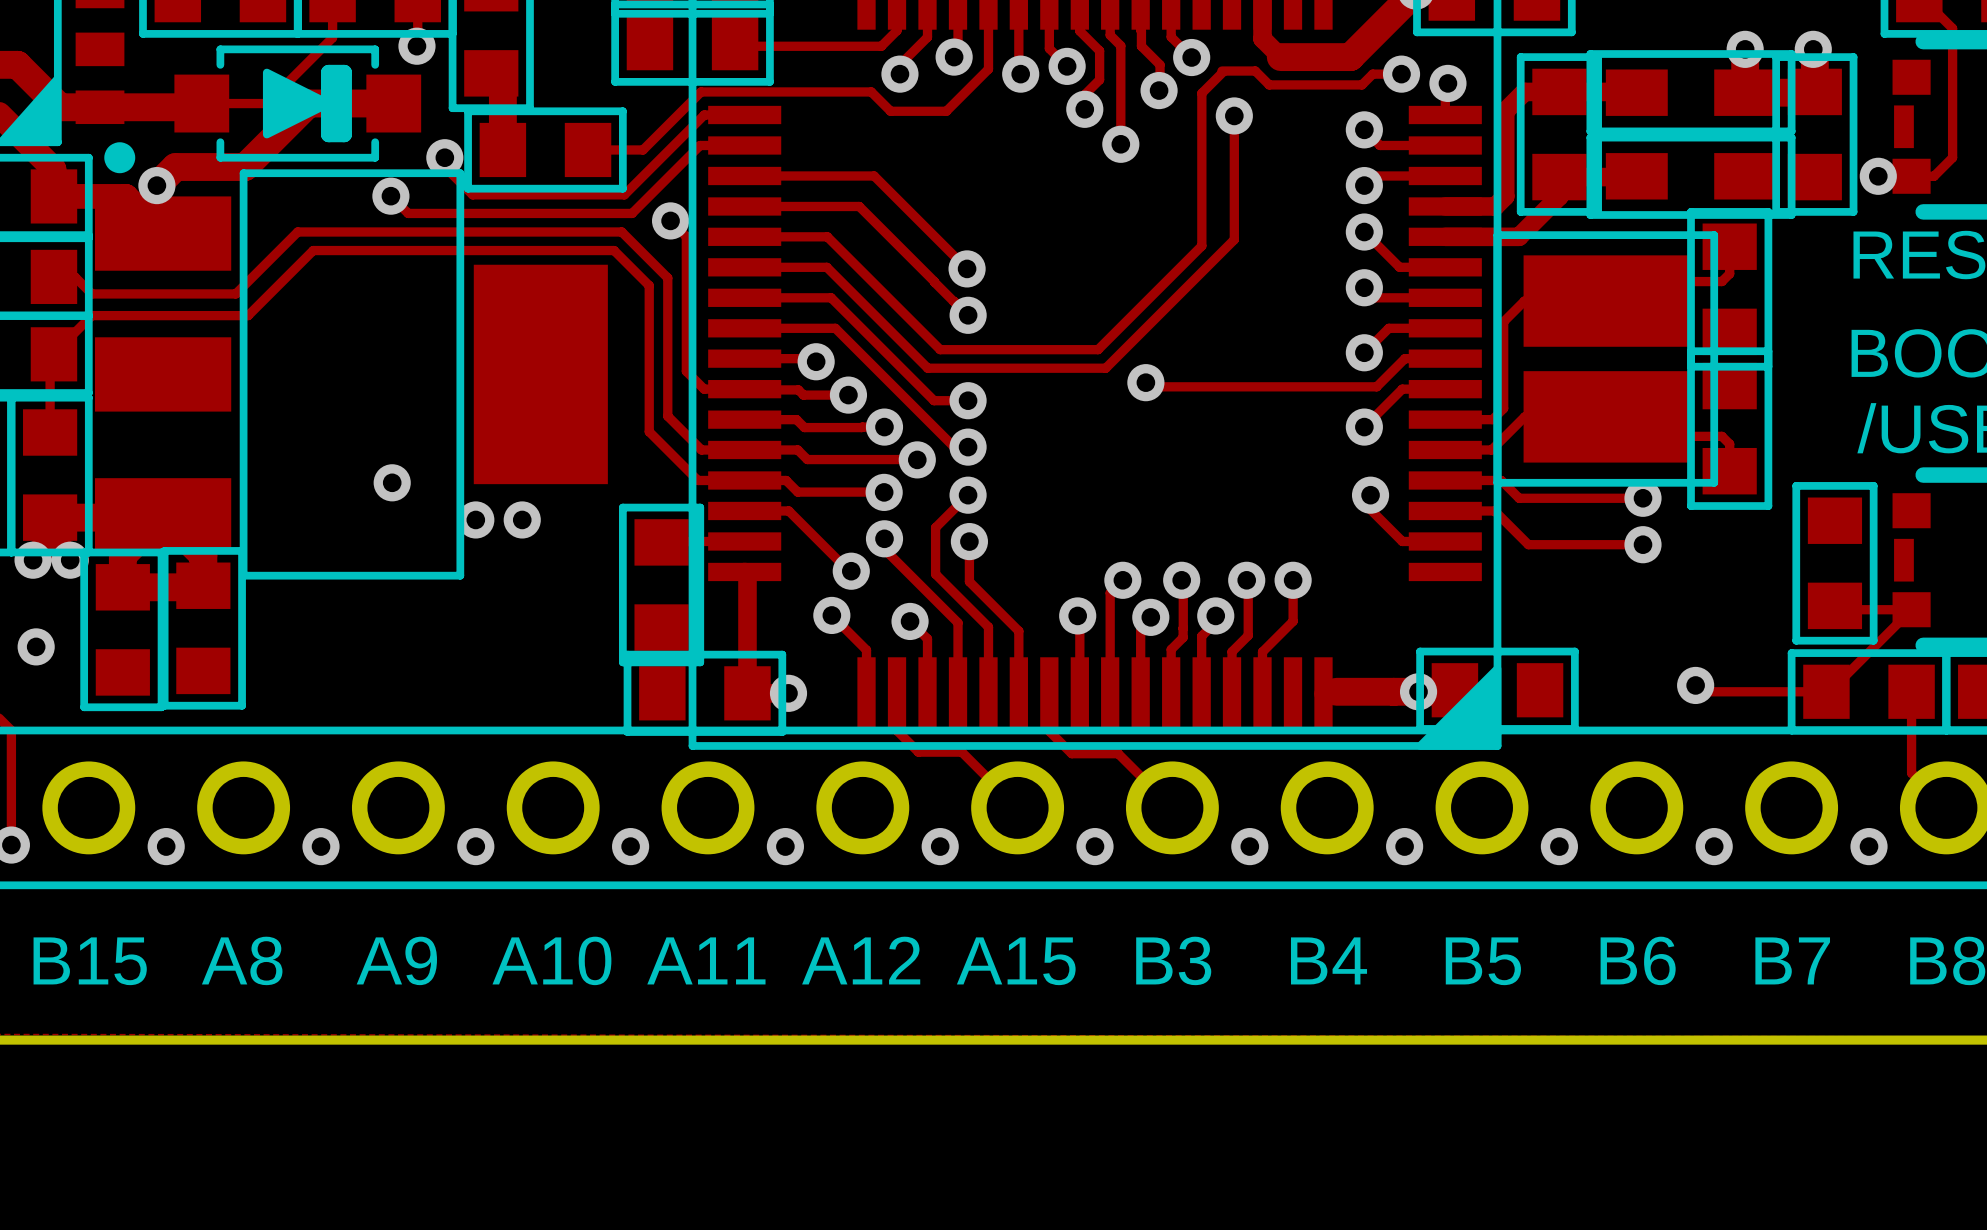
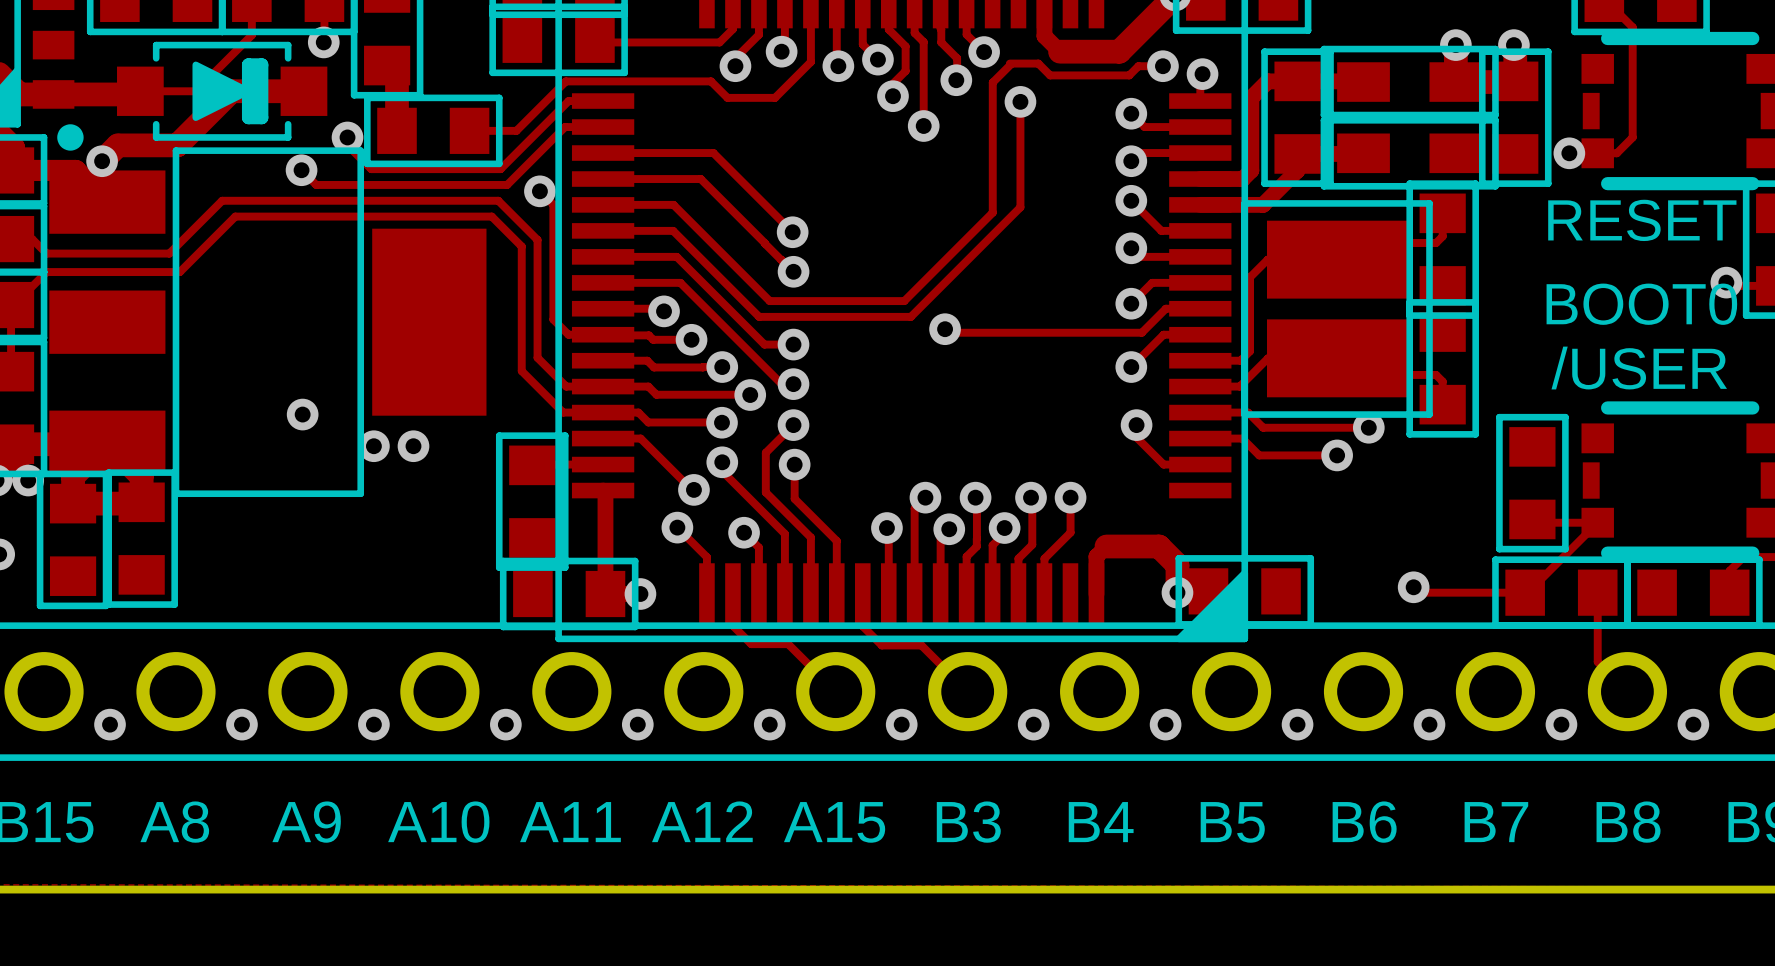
track: (1514, 530) (1528, 544) (1643, 544) -> (1259, 455) (1337, 455)
via position: (1643, 544) -> (1337, 455)
track: (1418, 691) (1336, 691) (1334, 693) (1323, 693) -> (1177, 592) (1177, 564) (1159, 546) (1106, 546) (1096, 556) (1096, 594)

